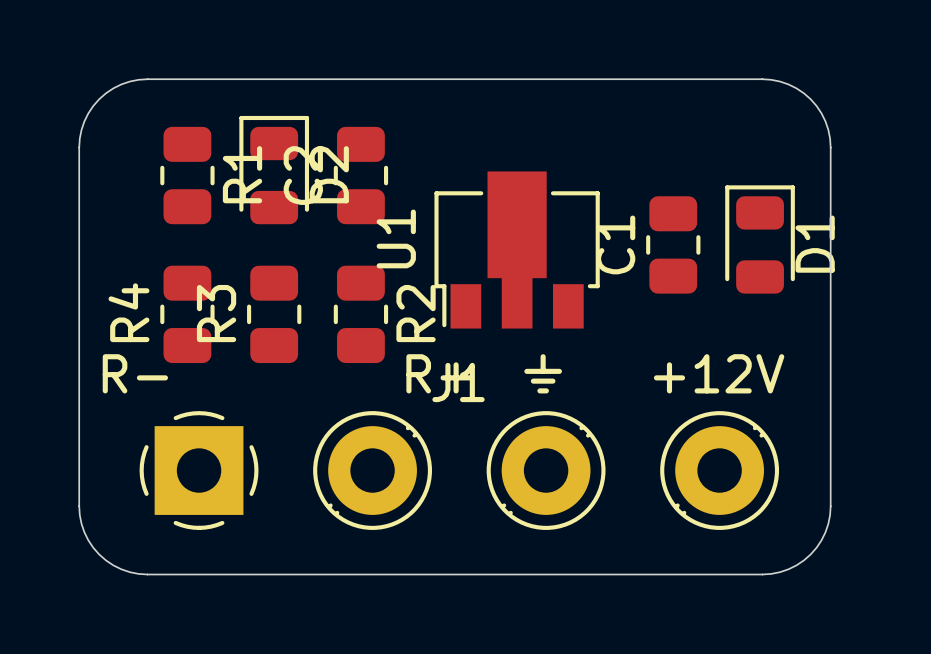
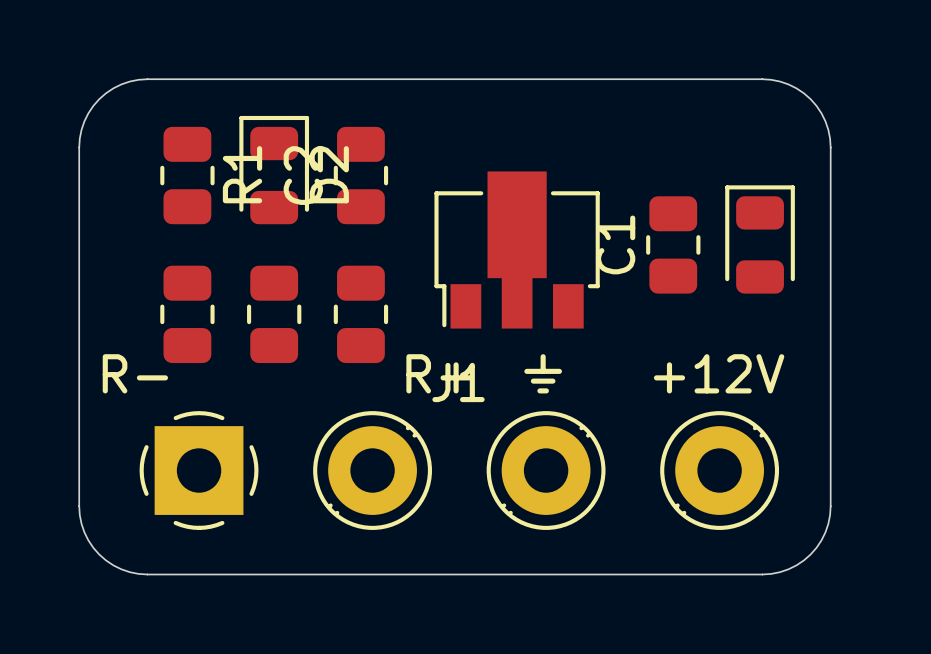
U1 name: U1 (396, 238) -> none
D1 name: D1 (815, 244) -> none
R4 name: R4 (128, 312) -> none
R3 name: R3 (216, 313) -> none
R2 name: R2 (416, 313) -> none

